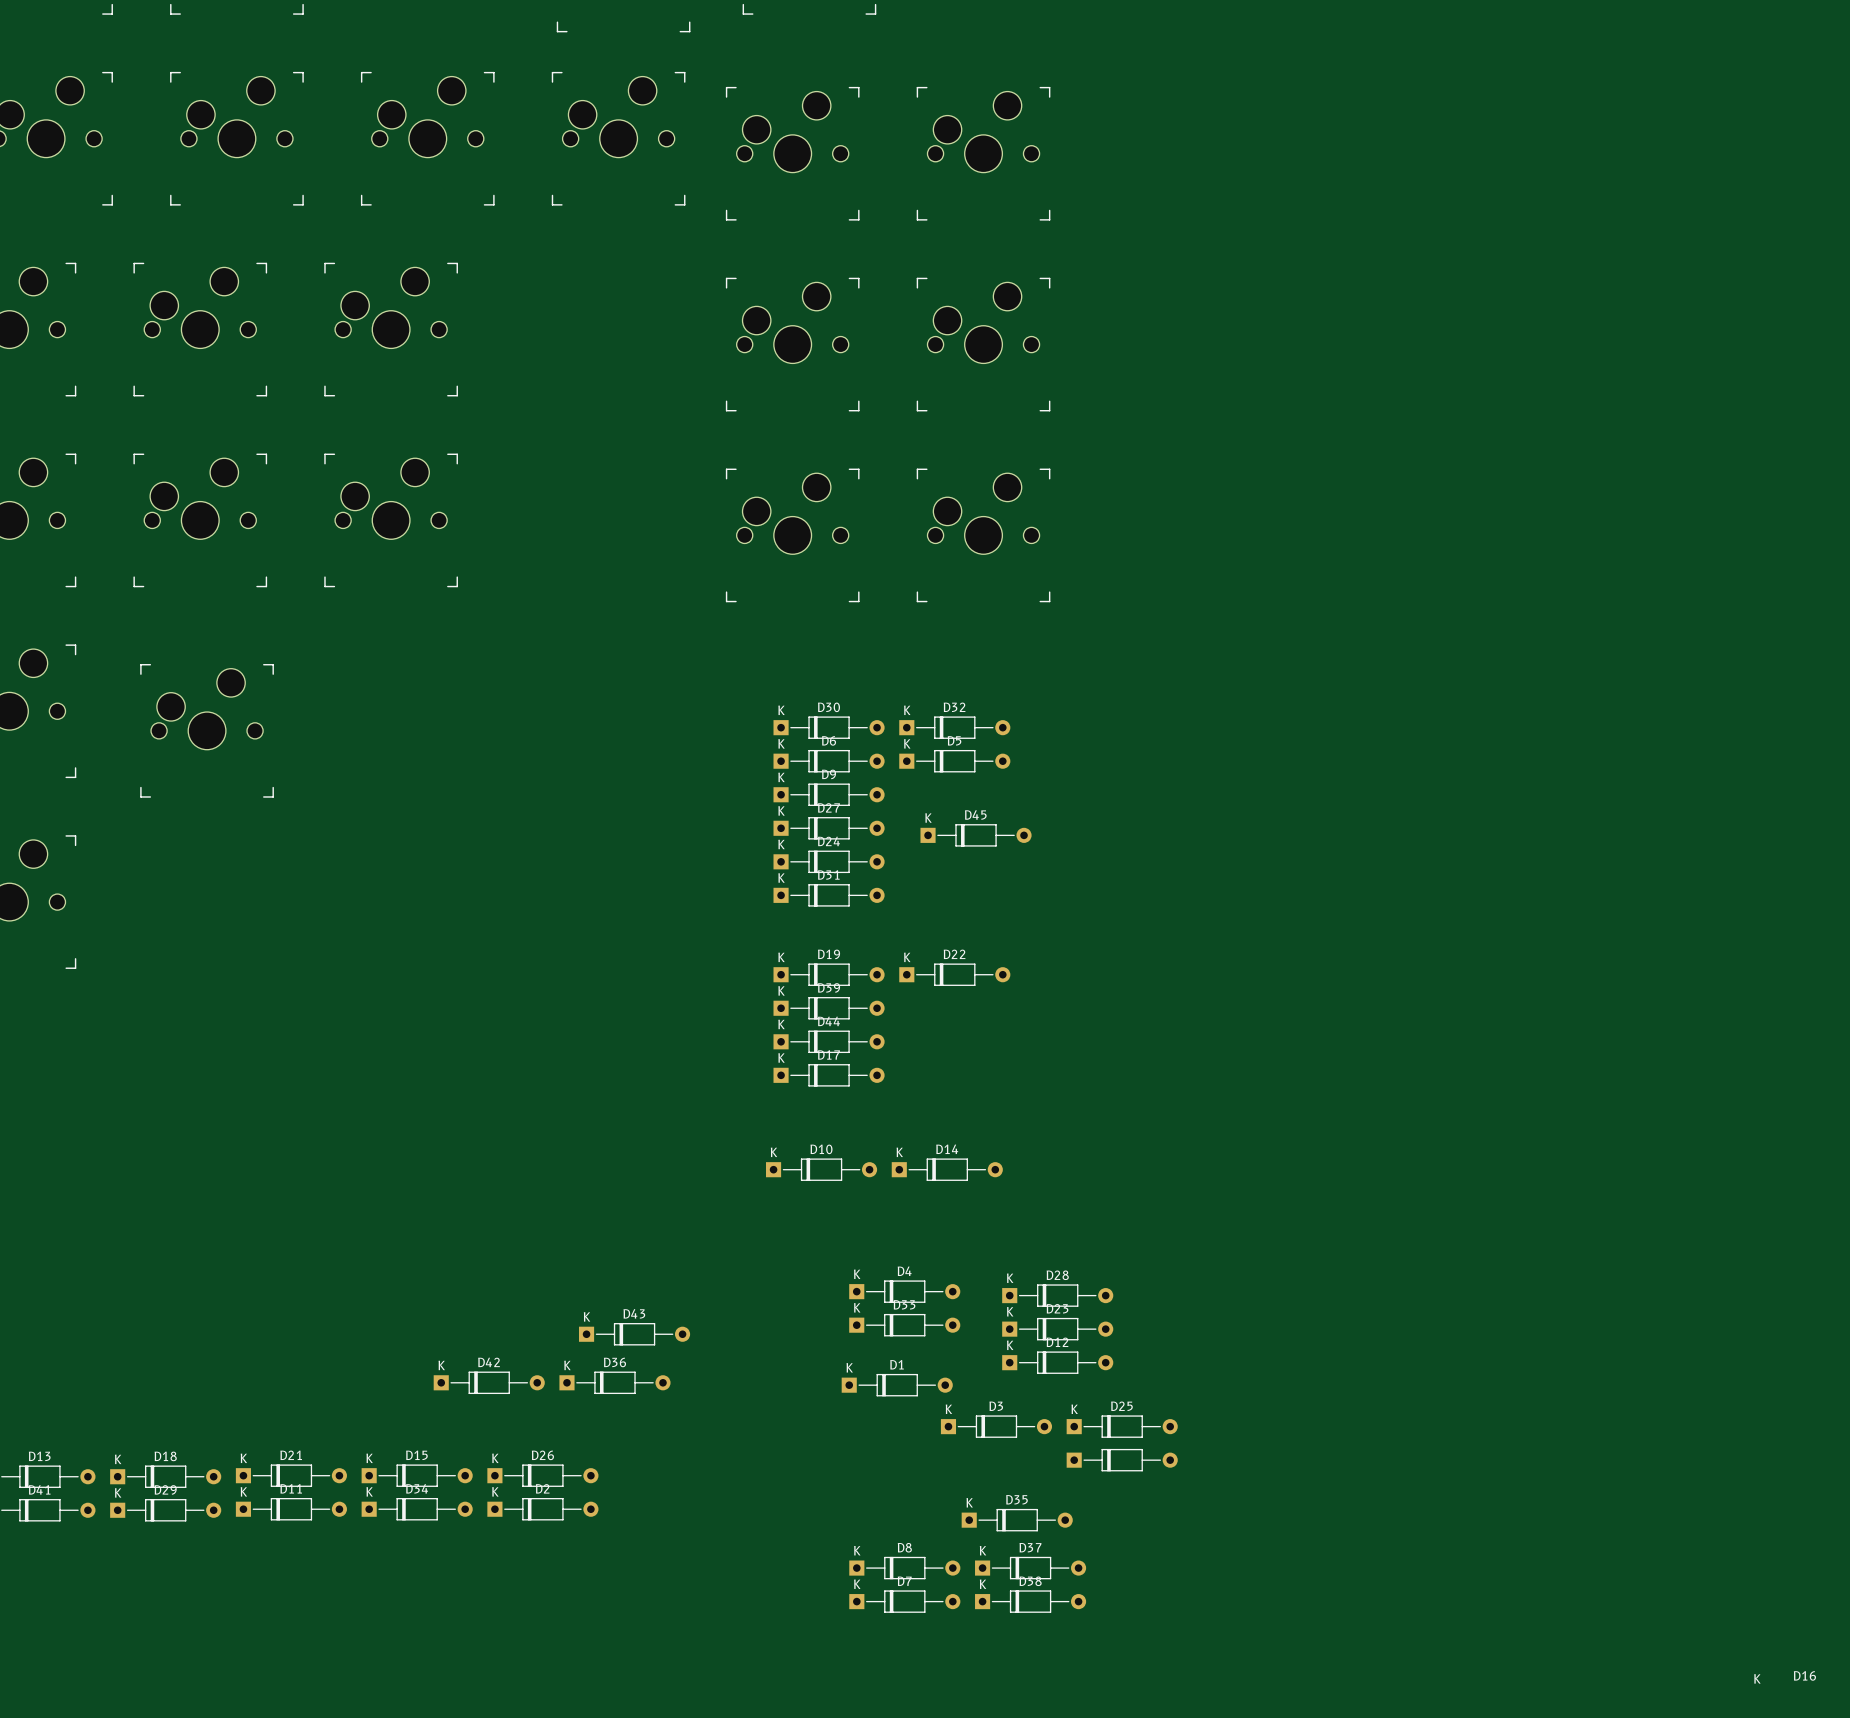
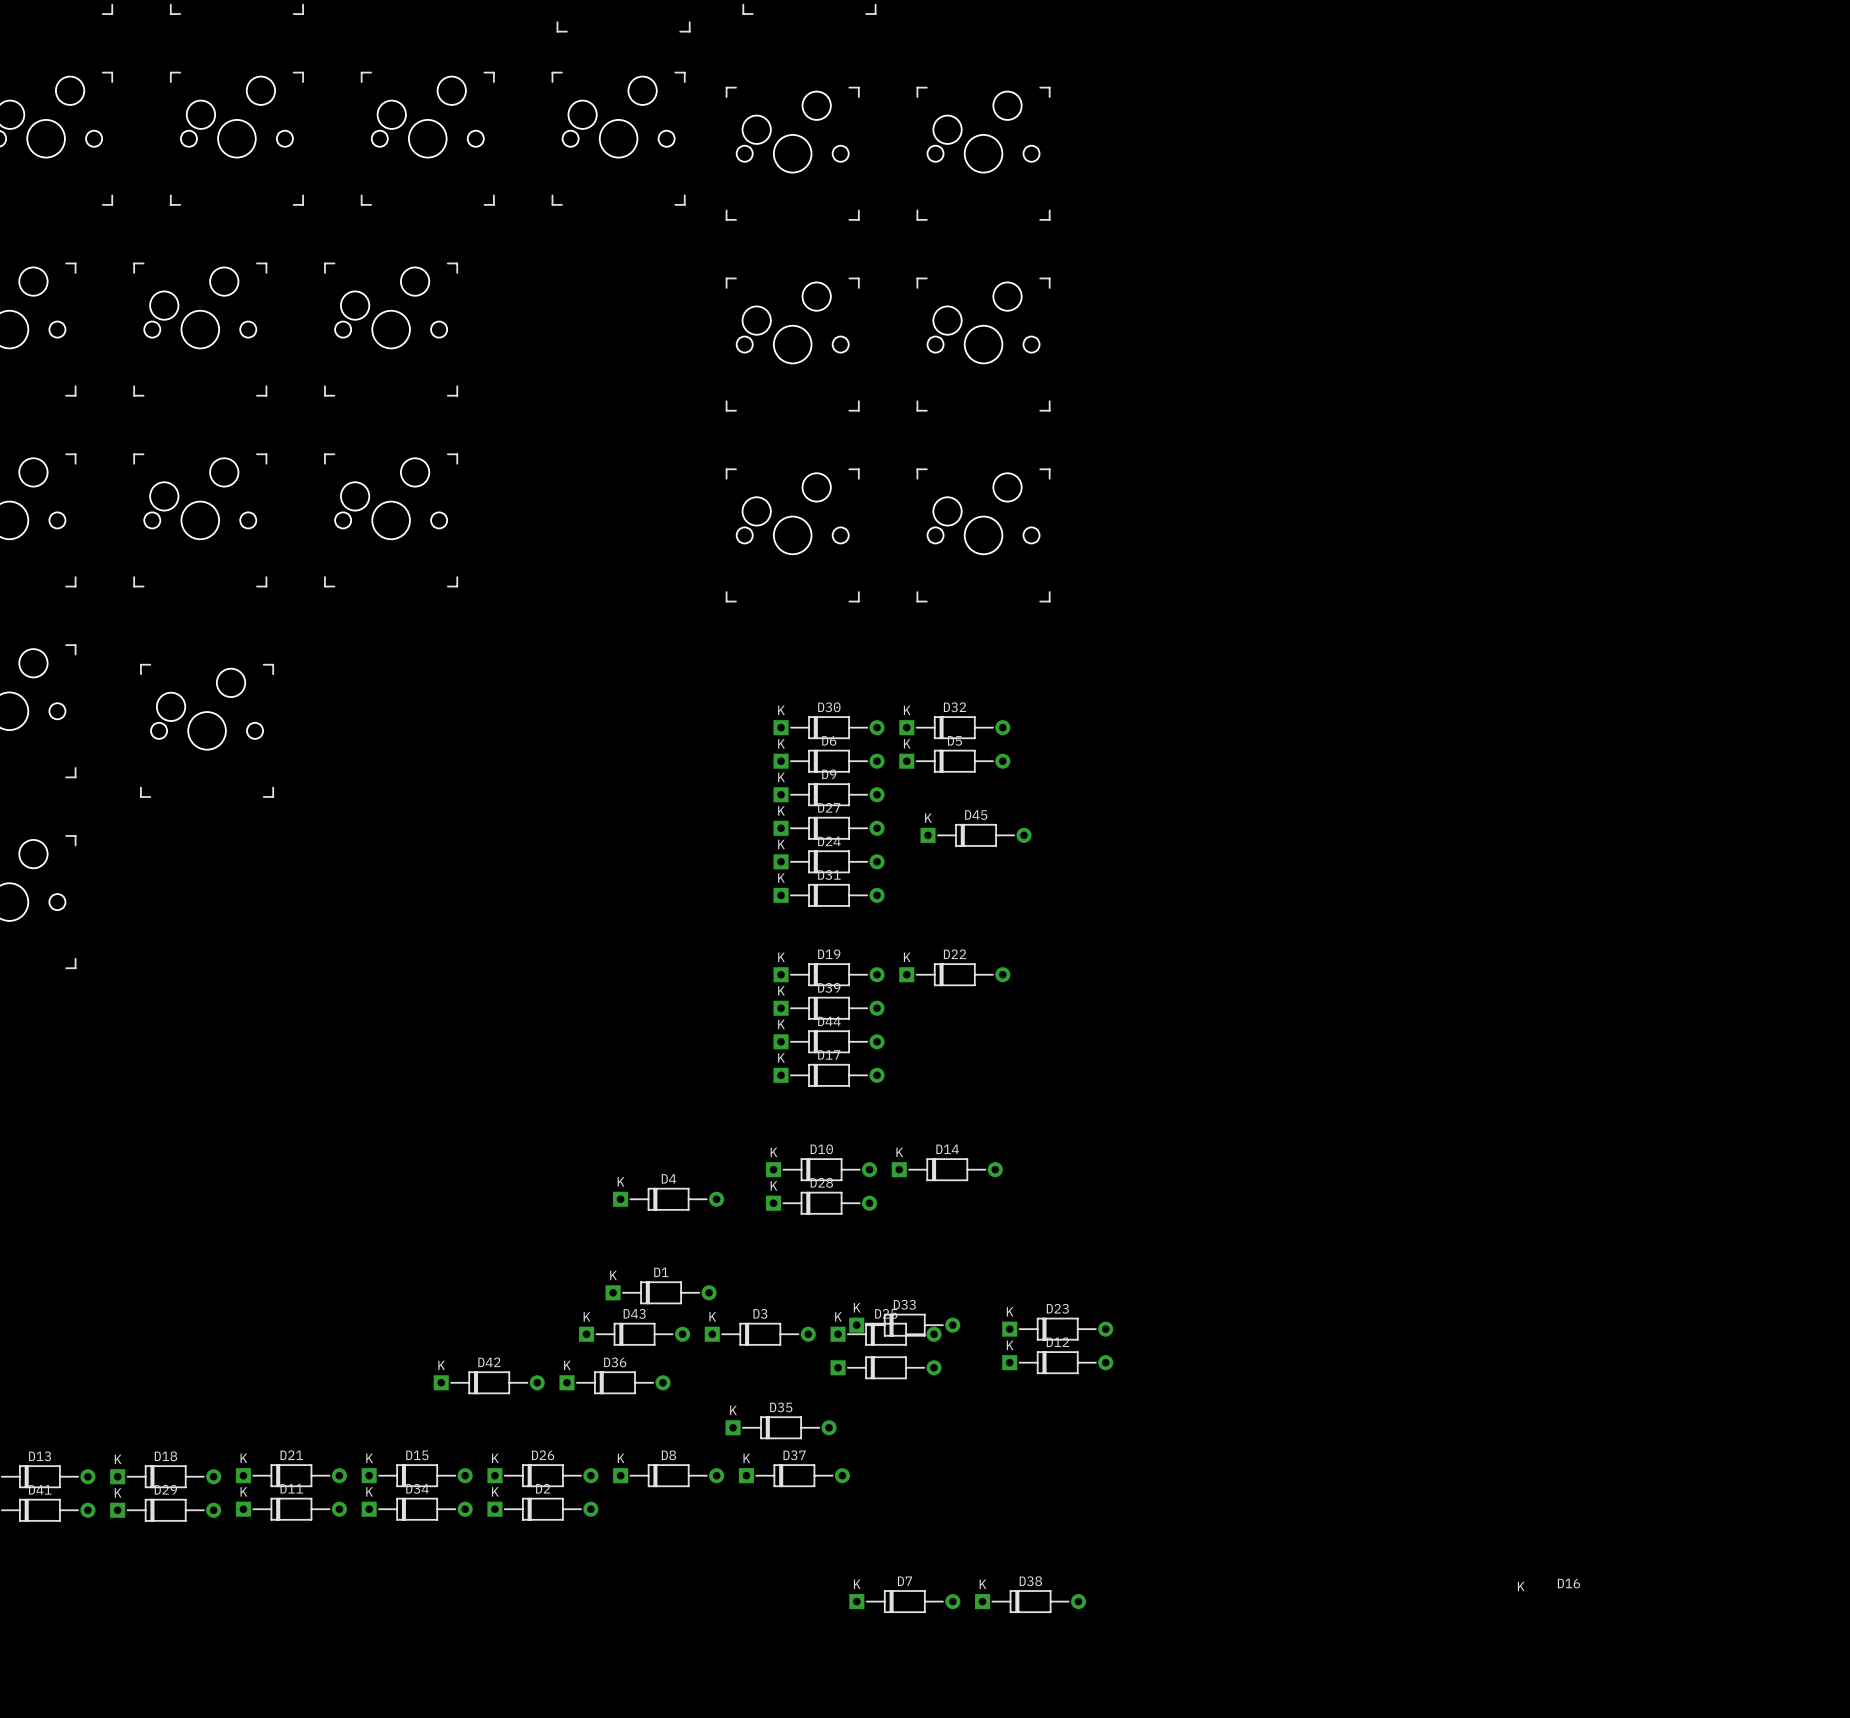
D4 position: (904, 1291) -> (668, 1199)
D28 position: (1057, 1295) -> (821, 1203)
D1 position: (897, 1385) -> (661, 1292)
D3 position: (996, 1426) -> (760, 1334)
D25 position: (1122, 1426) -> (886, 1334)
D16 position: (1122, 1460) -> (886, 1367)
D35 position: (1017, 1520) -> (781, 1427)
D8 position: (904, 1568) -> (668, 1475)
D37 position: (1030, 1568) -> (794, 1475)

